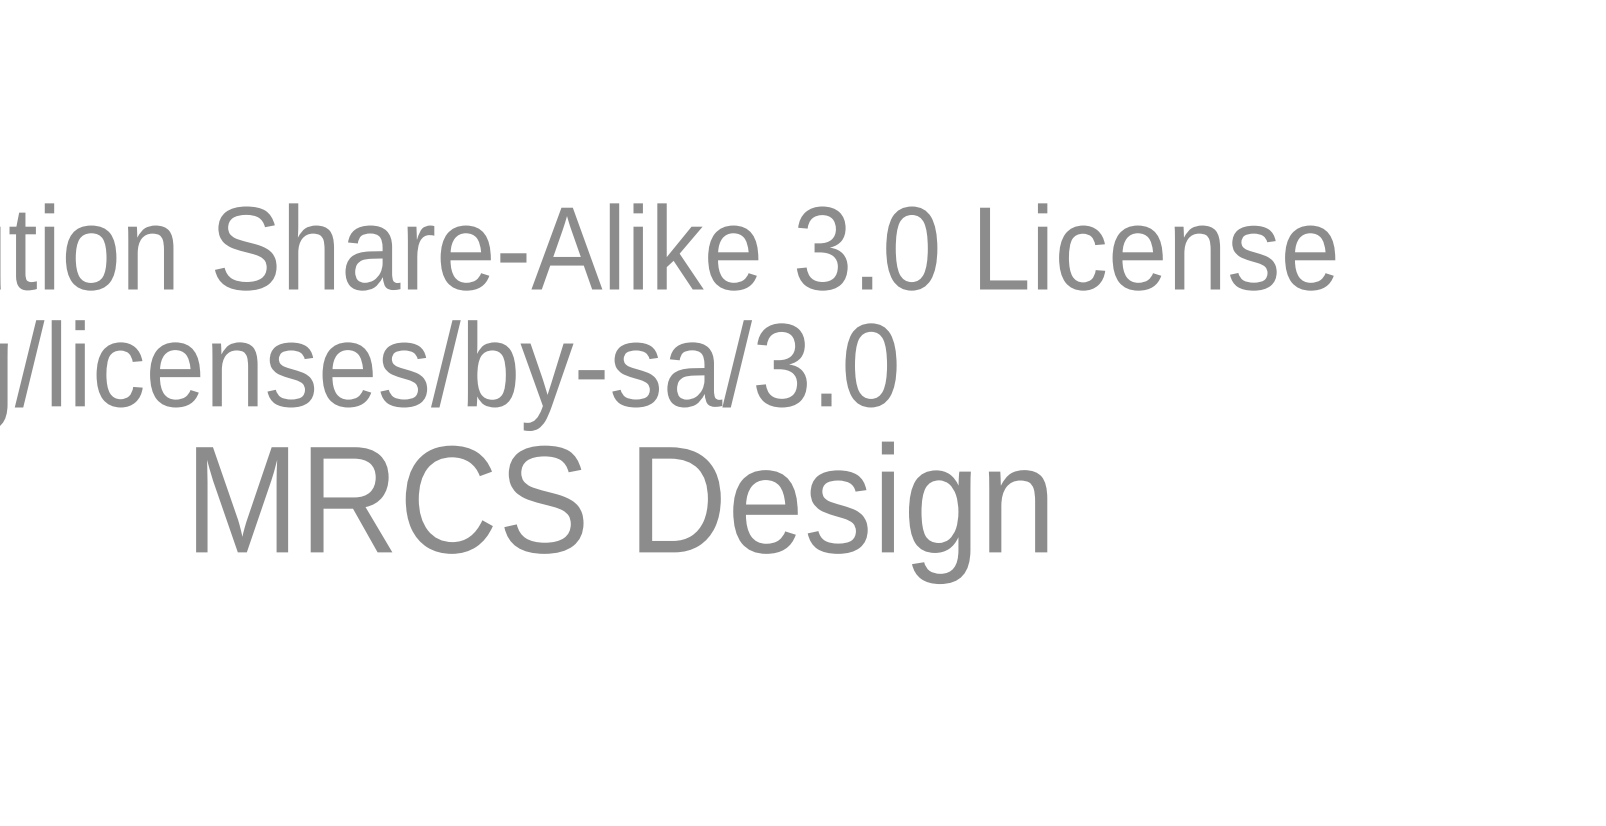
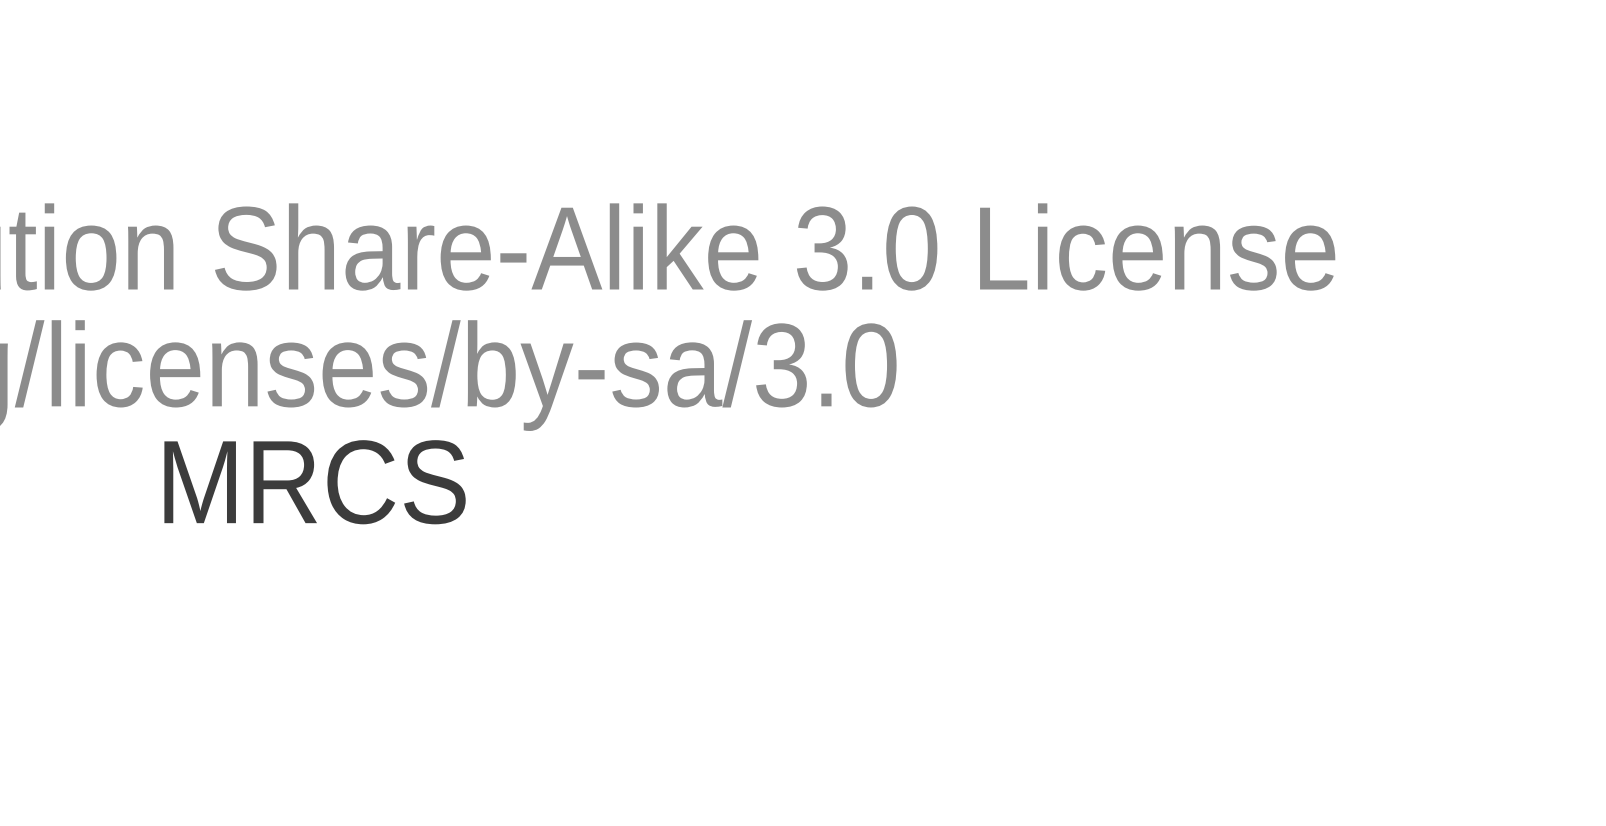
text: MRCS Design (621, 512) -> MRCS (315, 482)

